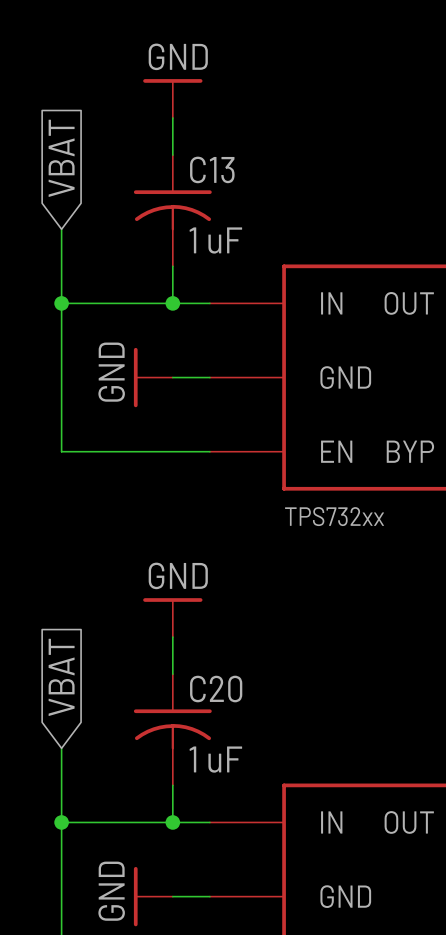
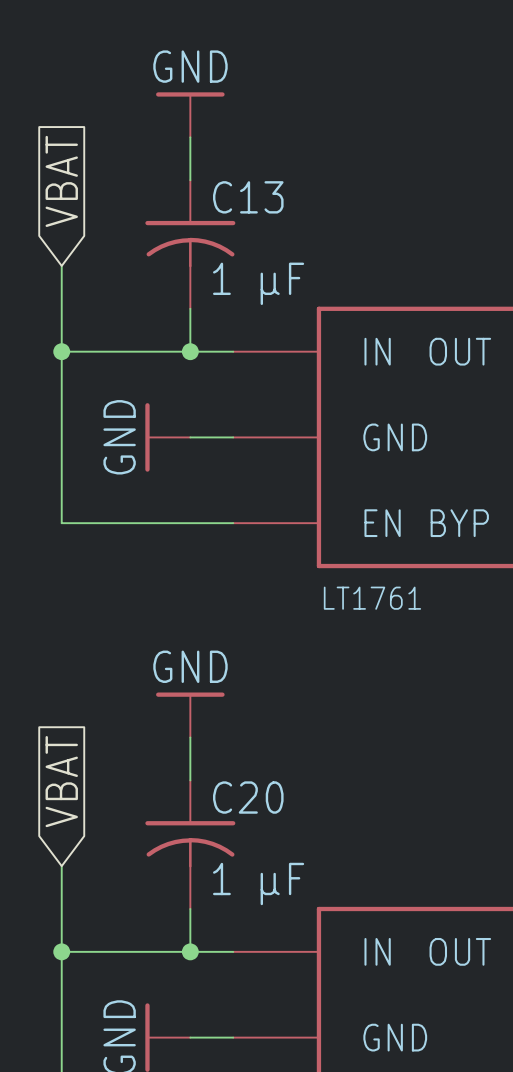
C13 value: 1 uF (215, 240) -> 1 μF (258, 283)
part text: TPS732xx (334, 516) -> LT1761 (372, 598)
C20 value: 1 uF (215, 759) -> 1 μF (258, 883)

